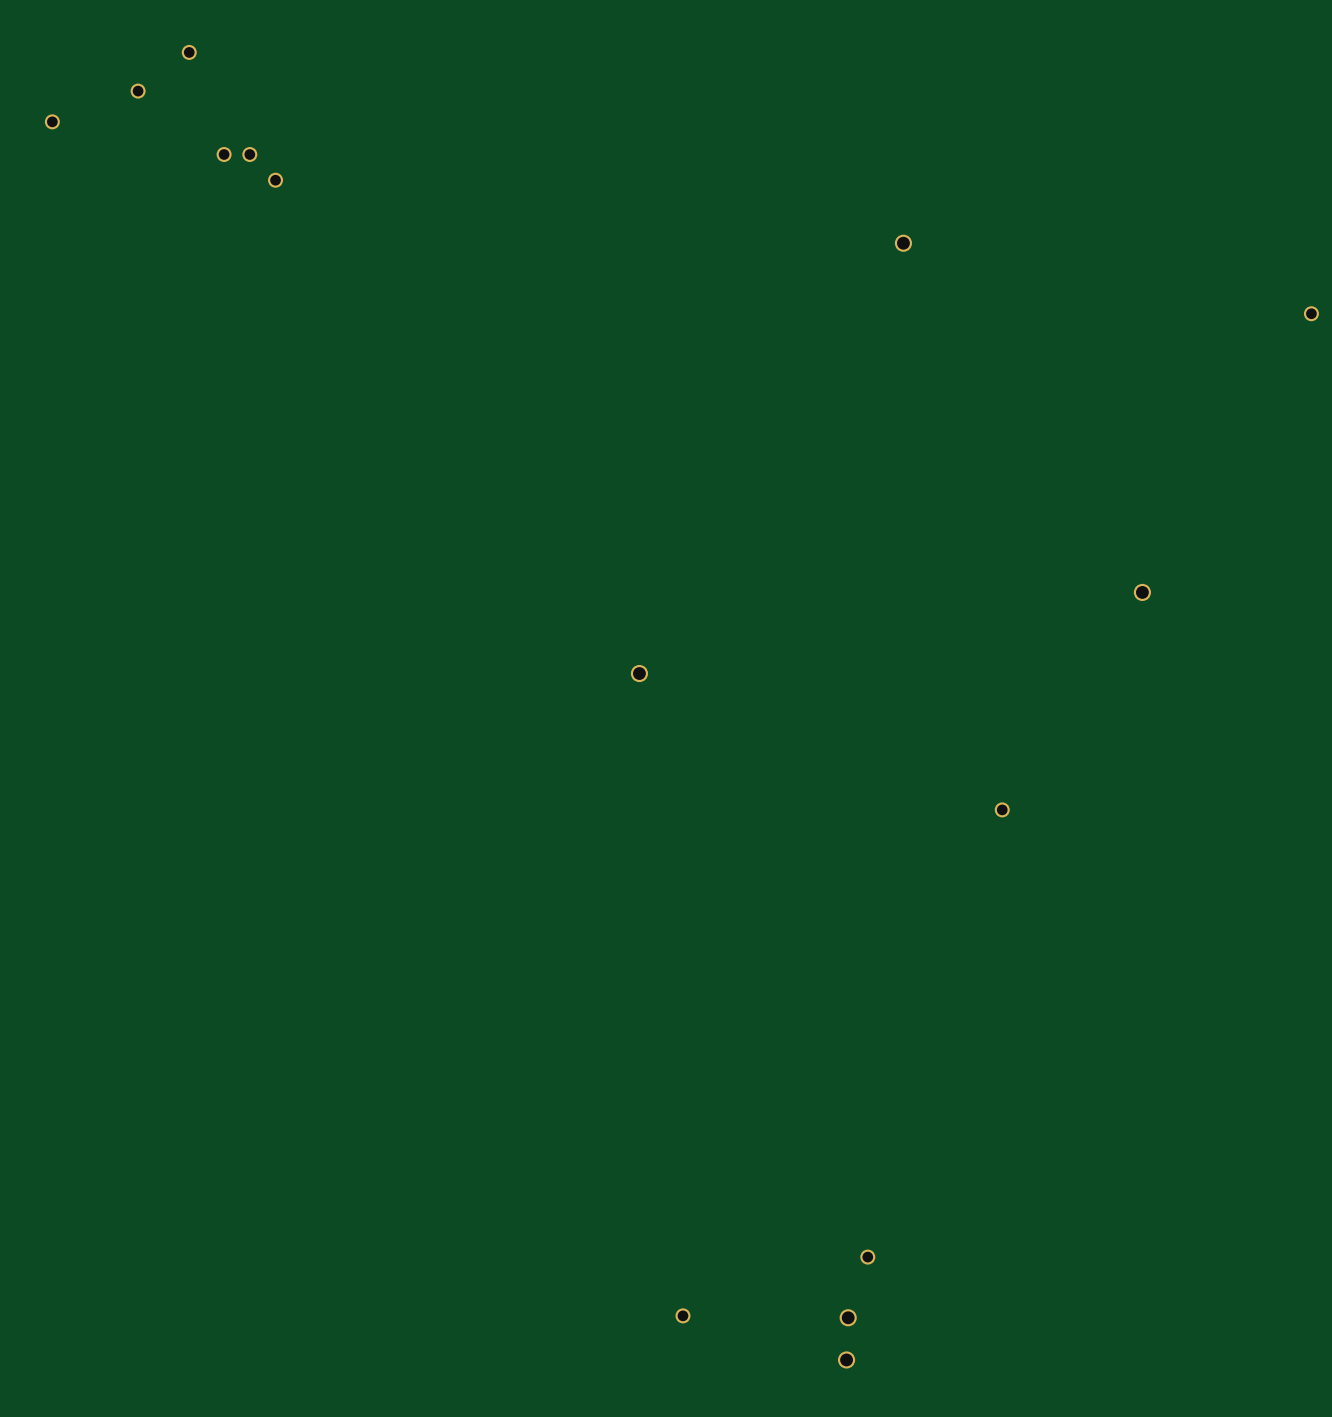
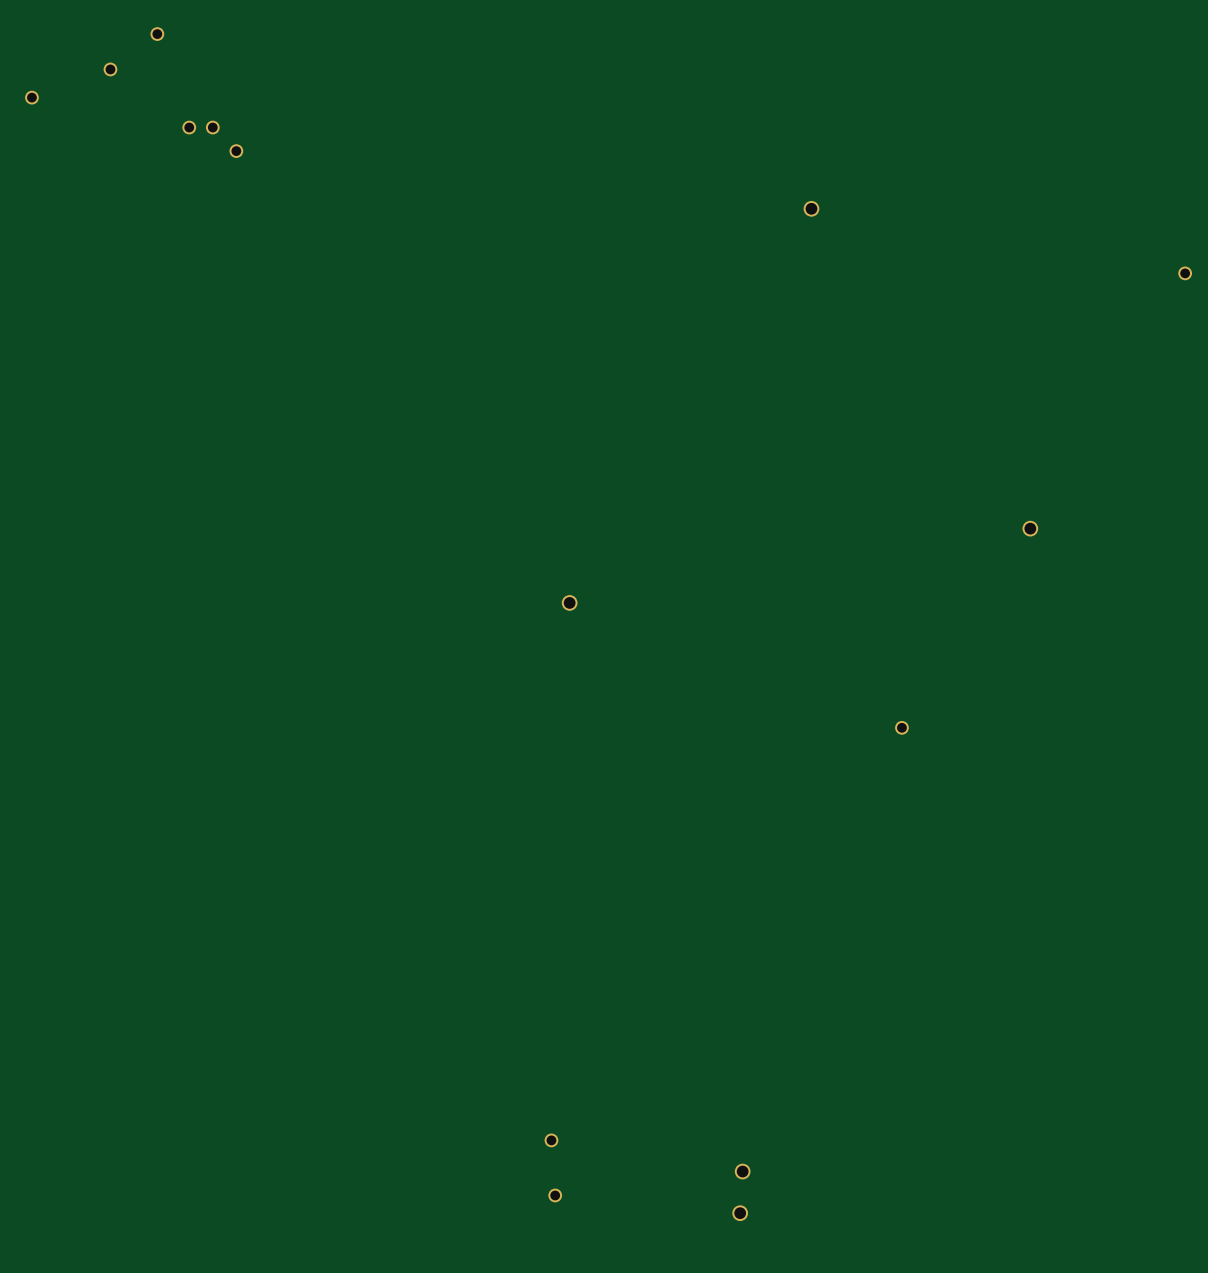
part: (867, 1257) -> none
part: none -> (551, 1140)
part: none -> (742, 1171)
part: (682, 1315) -> none
part: (848, 1317) -> none
part: none -> (555, 1195)
part: none -> (740, 1213)
part: (846, 1359) -> none

